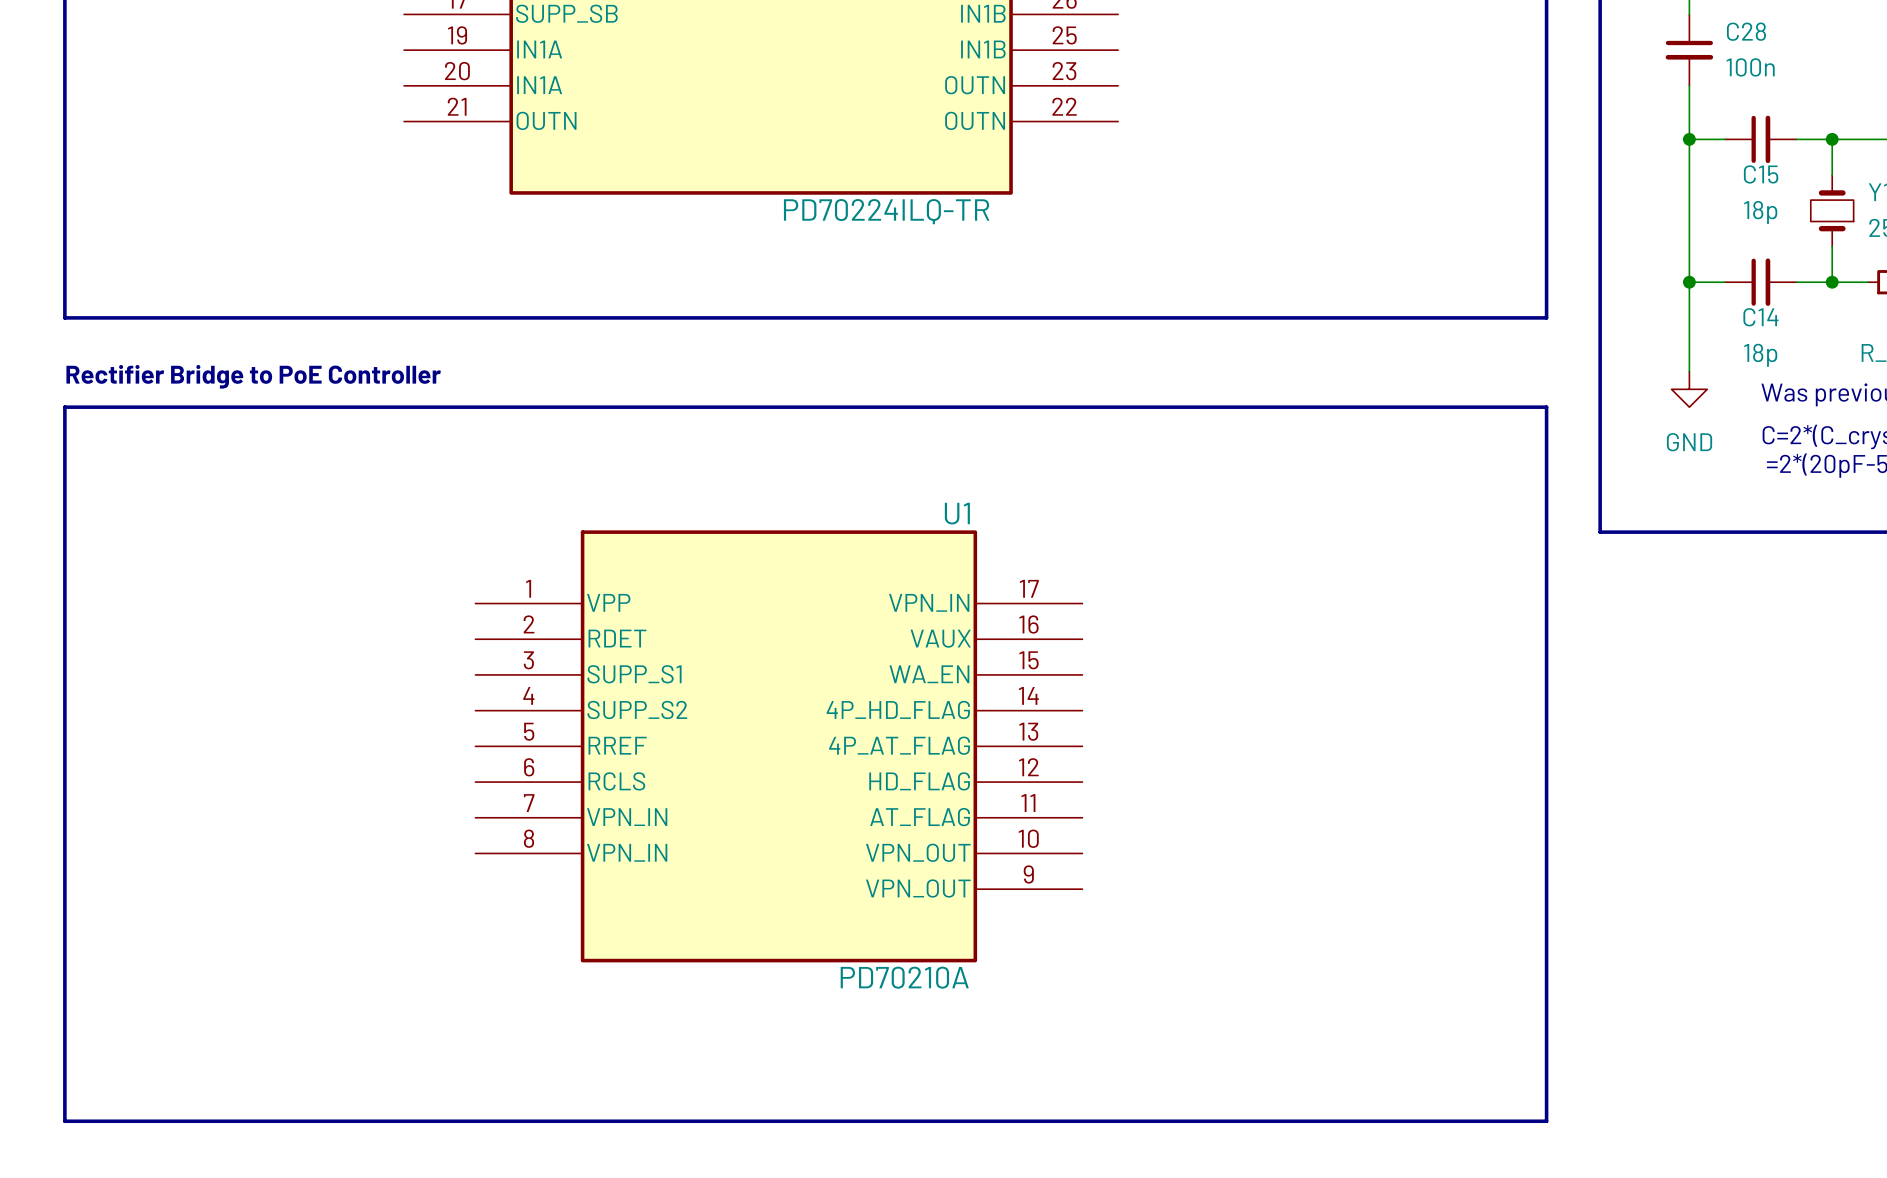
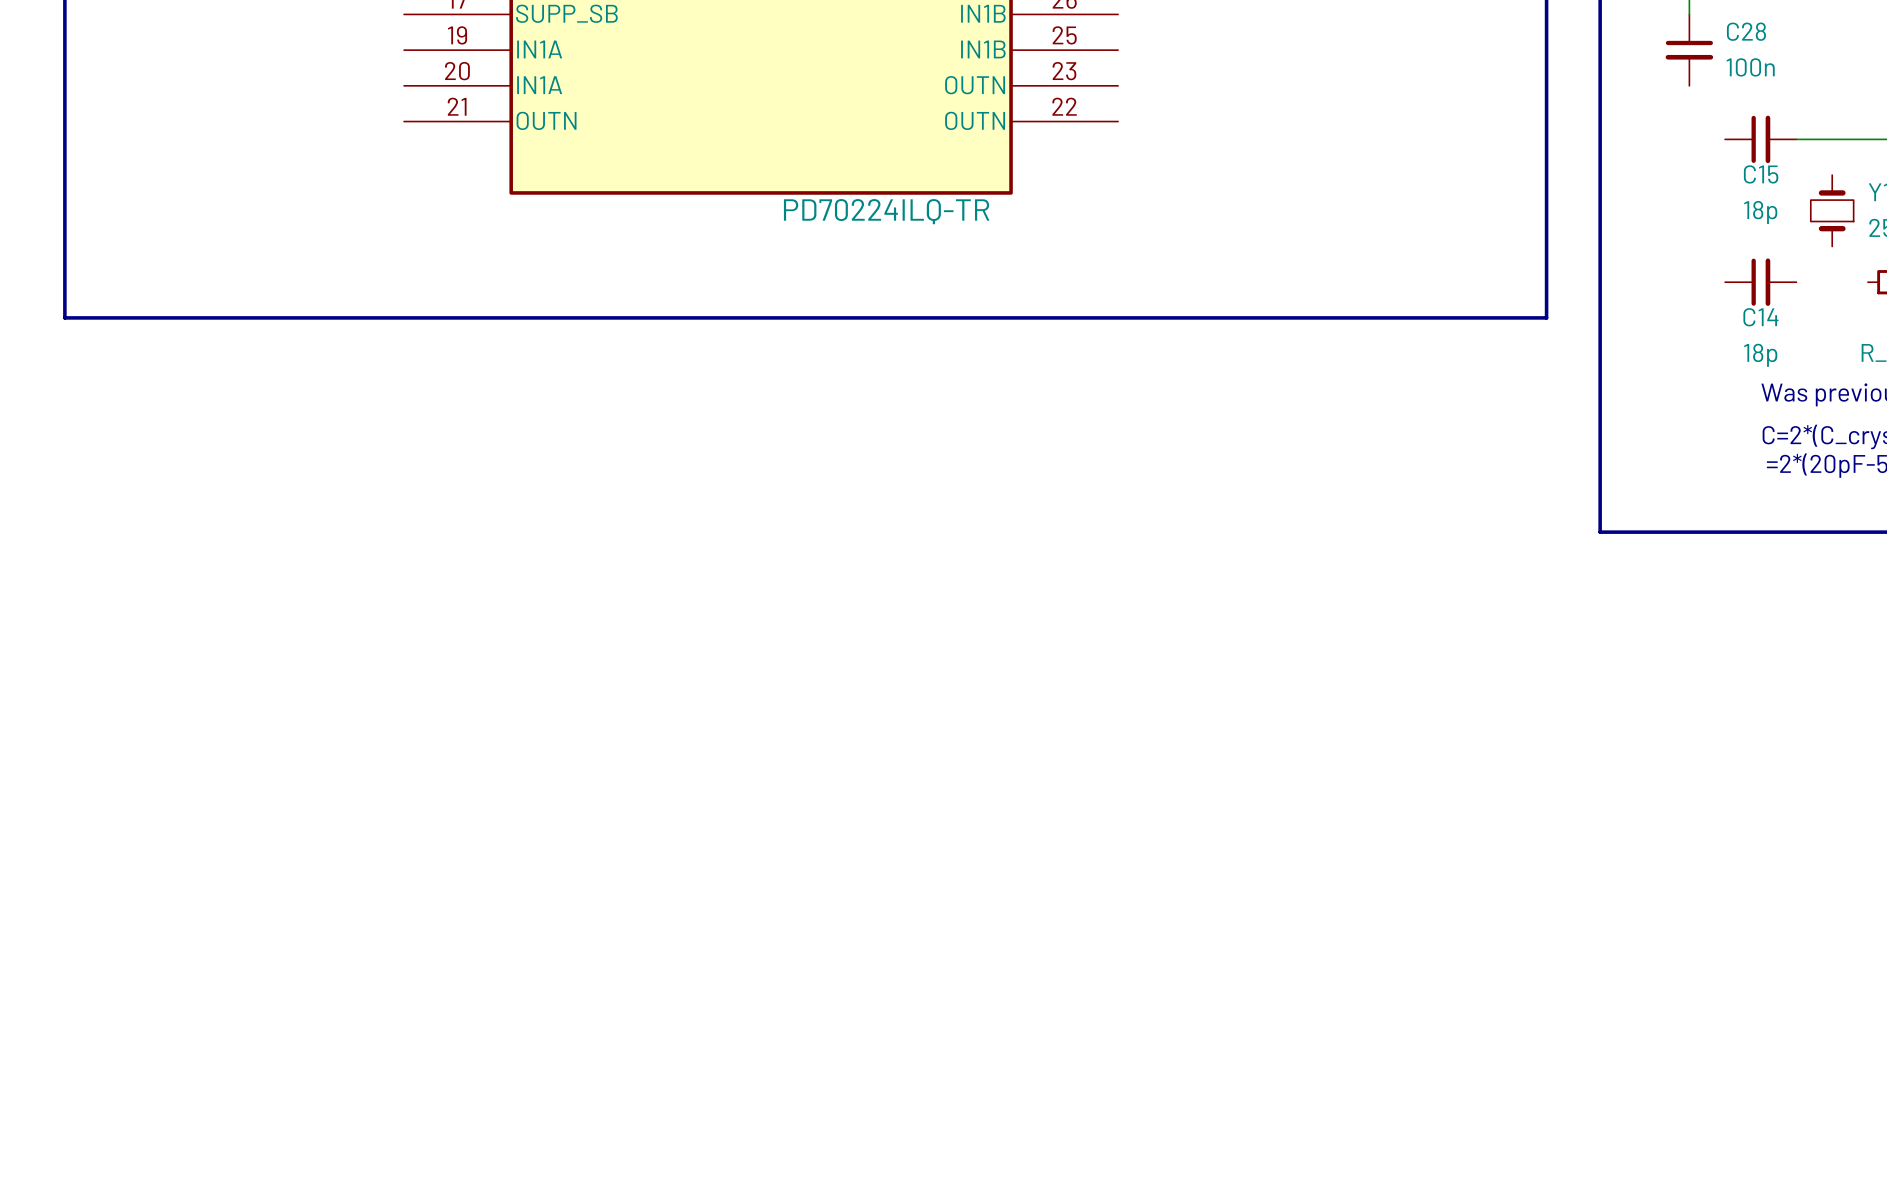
wire: (1689, 85) (1689, 371) -> none
wire: (1689, 139) (1725, 139) -> none
junction: (1689, 139) -> none
wire: (1832, 139) (1832, 175) -> none
junction: (1832, 139) -> none
wire: (1832, 246) (1832, 282) -> none
wire: (1689, 282) (1725, 282) -> none
junction: (1689, 282) -> none
wire: (1796, 282) (1867, 282) -> none
junction: (1832, 282) -> none
text: Rectifier Bridge to PoE Controller (253, 376) -> none
power symbol: GND (1689, 389) -> none
line: (64, 407) (64, 1121) (1546, 1121) (1546, 407) (64, 407) -> none
U1: PD70210A (778, 746) -> none

